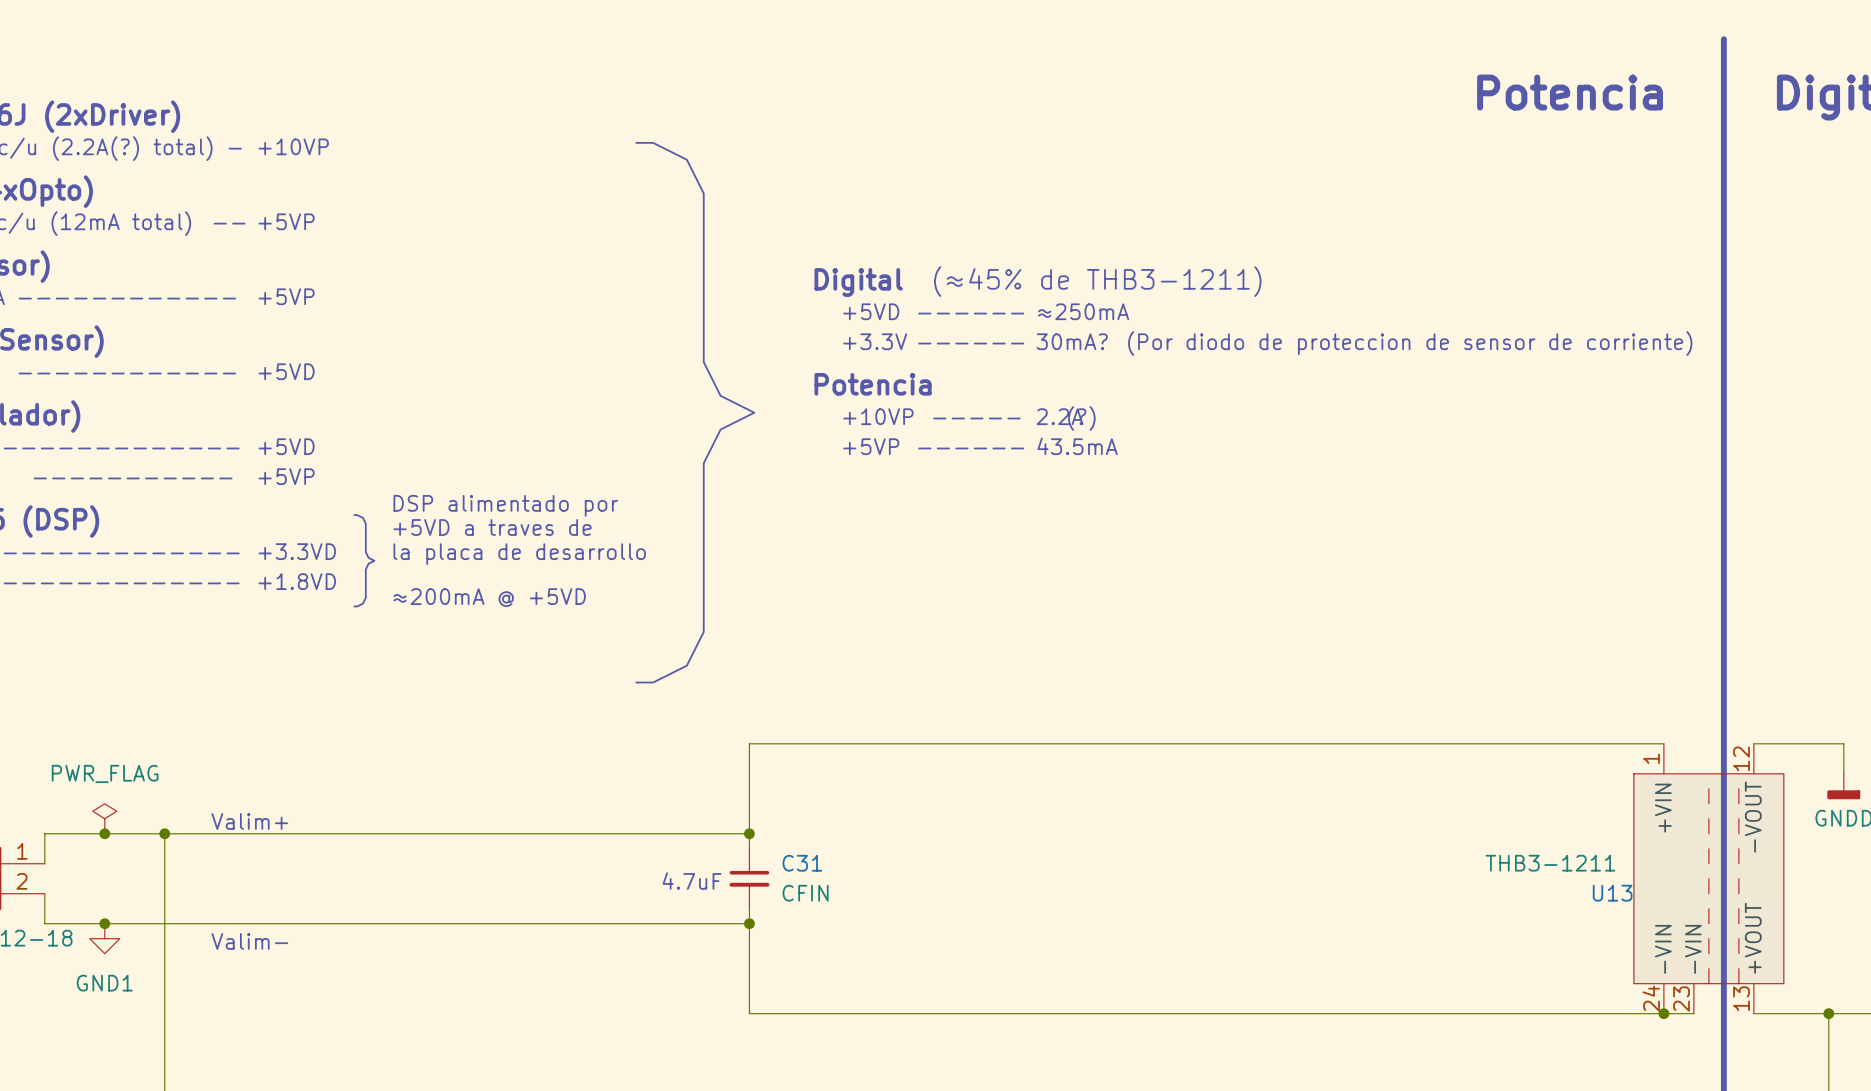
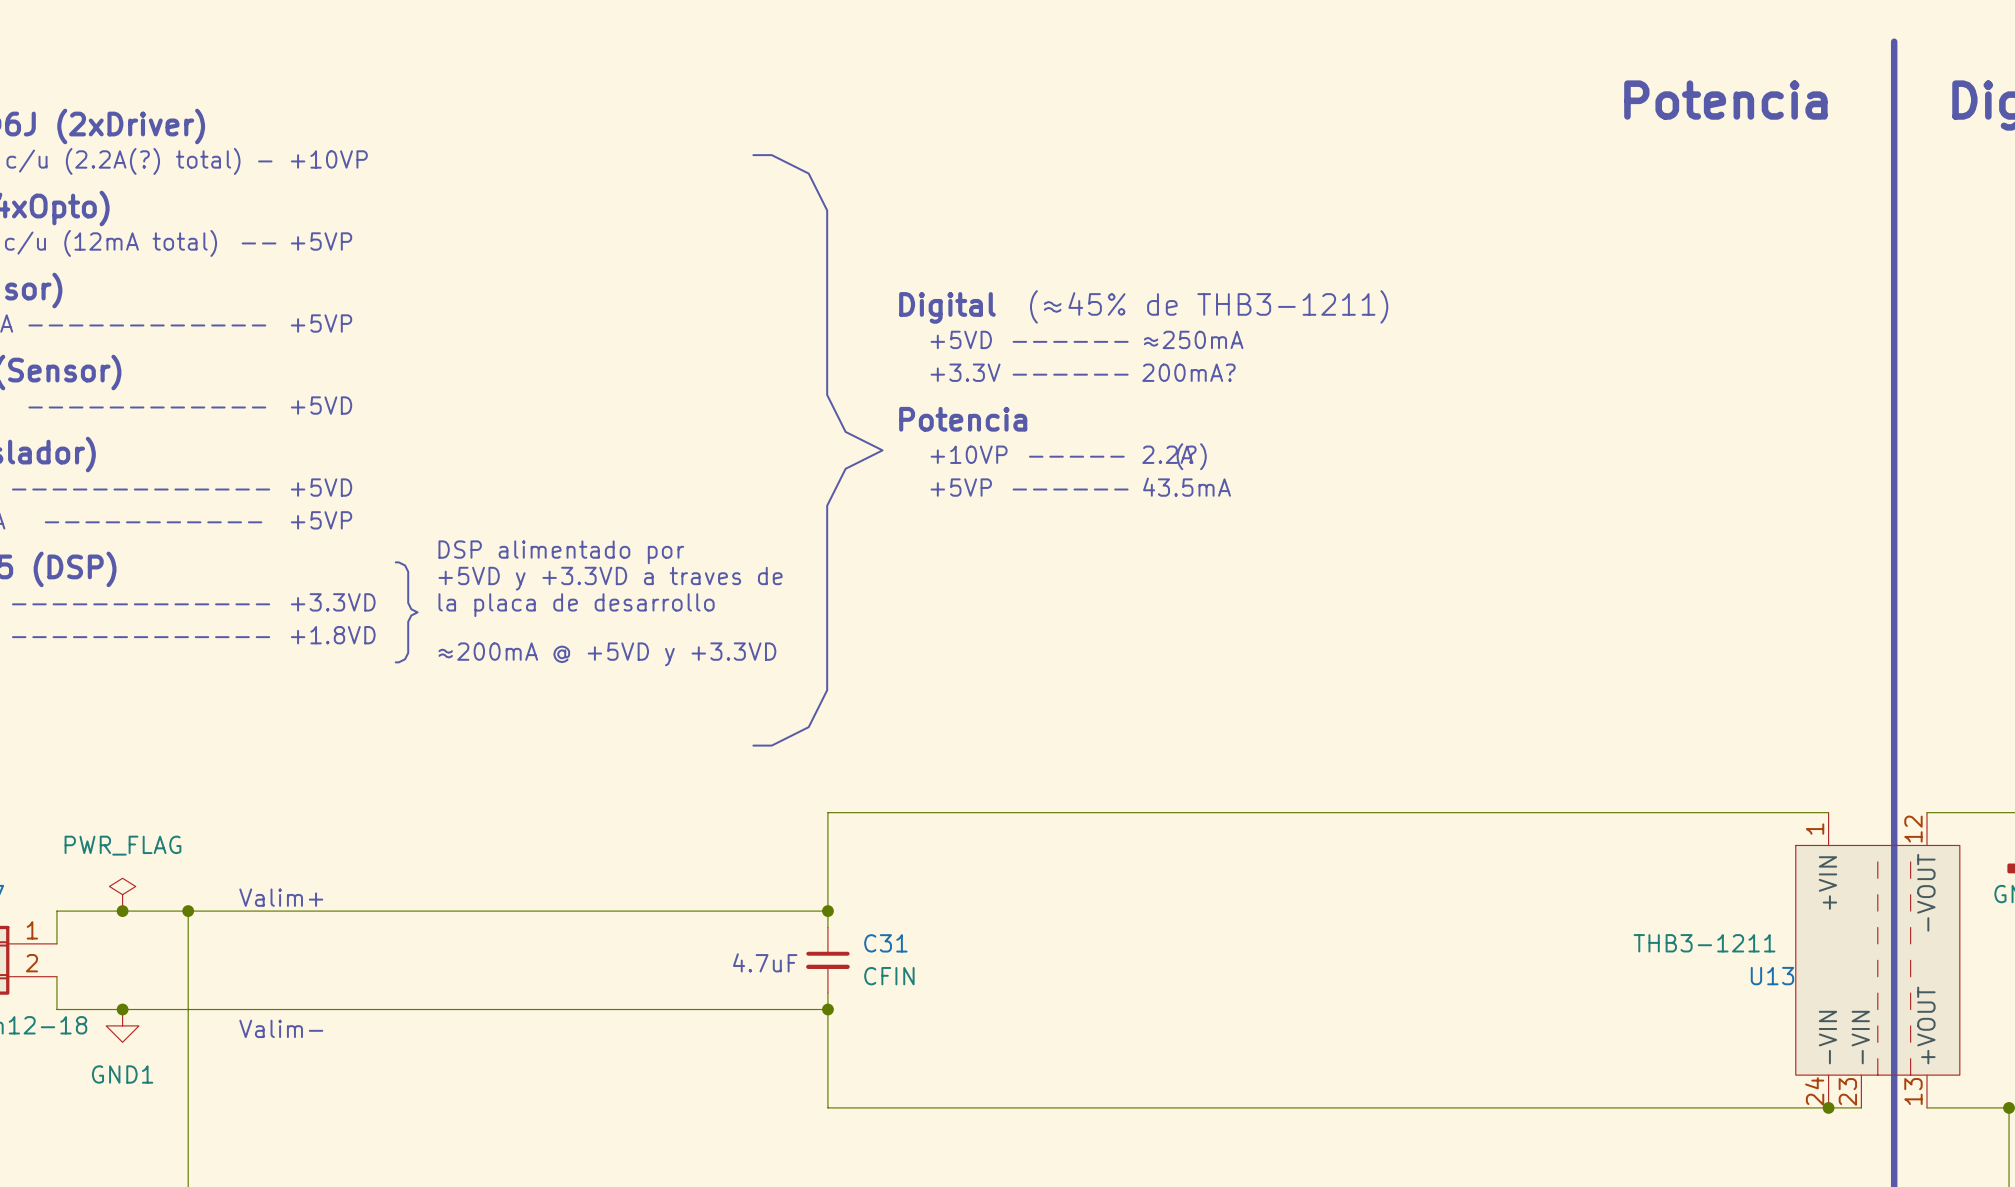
text: 30mA? (1072, 341) -> 200mA? (1188, 372)
text: (Por diodo de proteccion de sensor de corriente) (1410, 343) -> none
text position: } (695, 412) -> } (817, 450)
text: +5VD a traves de (492, 527) -> +5VD y +3.3VD a traves de (610, 578)
text: ≈200mA @ +5VD (489, 597) -> ≈200mA @ +5VD y +3.3VD (607, 654)

